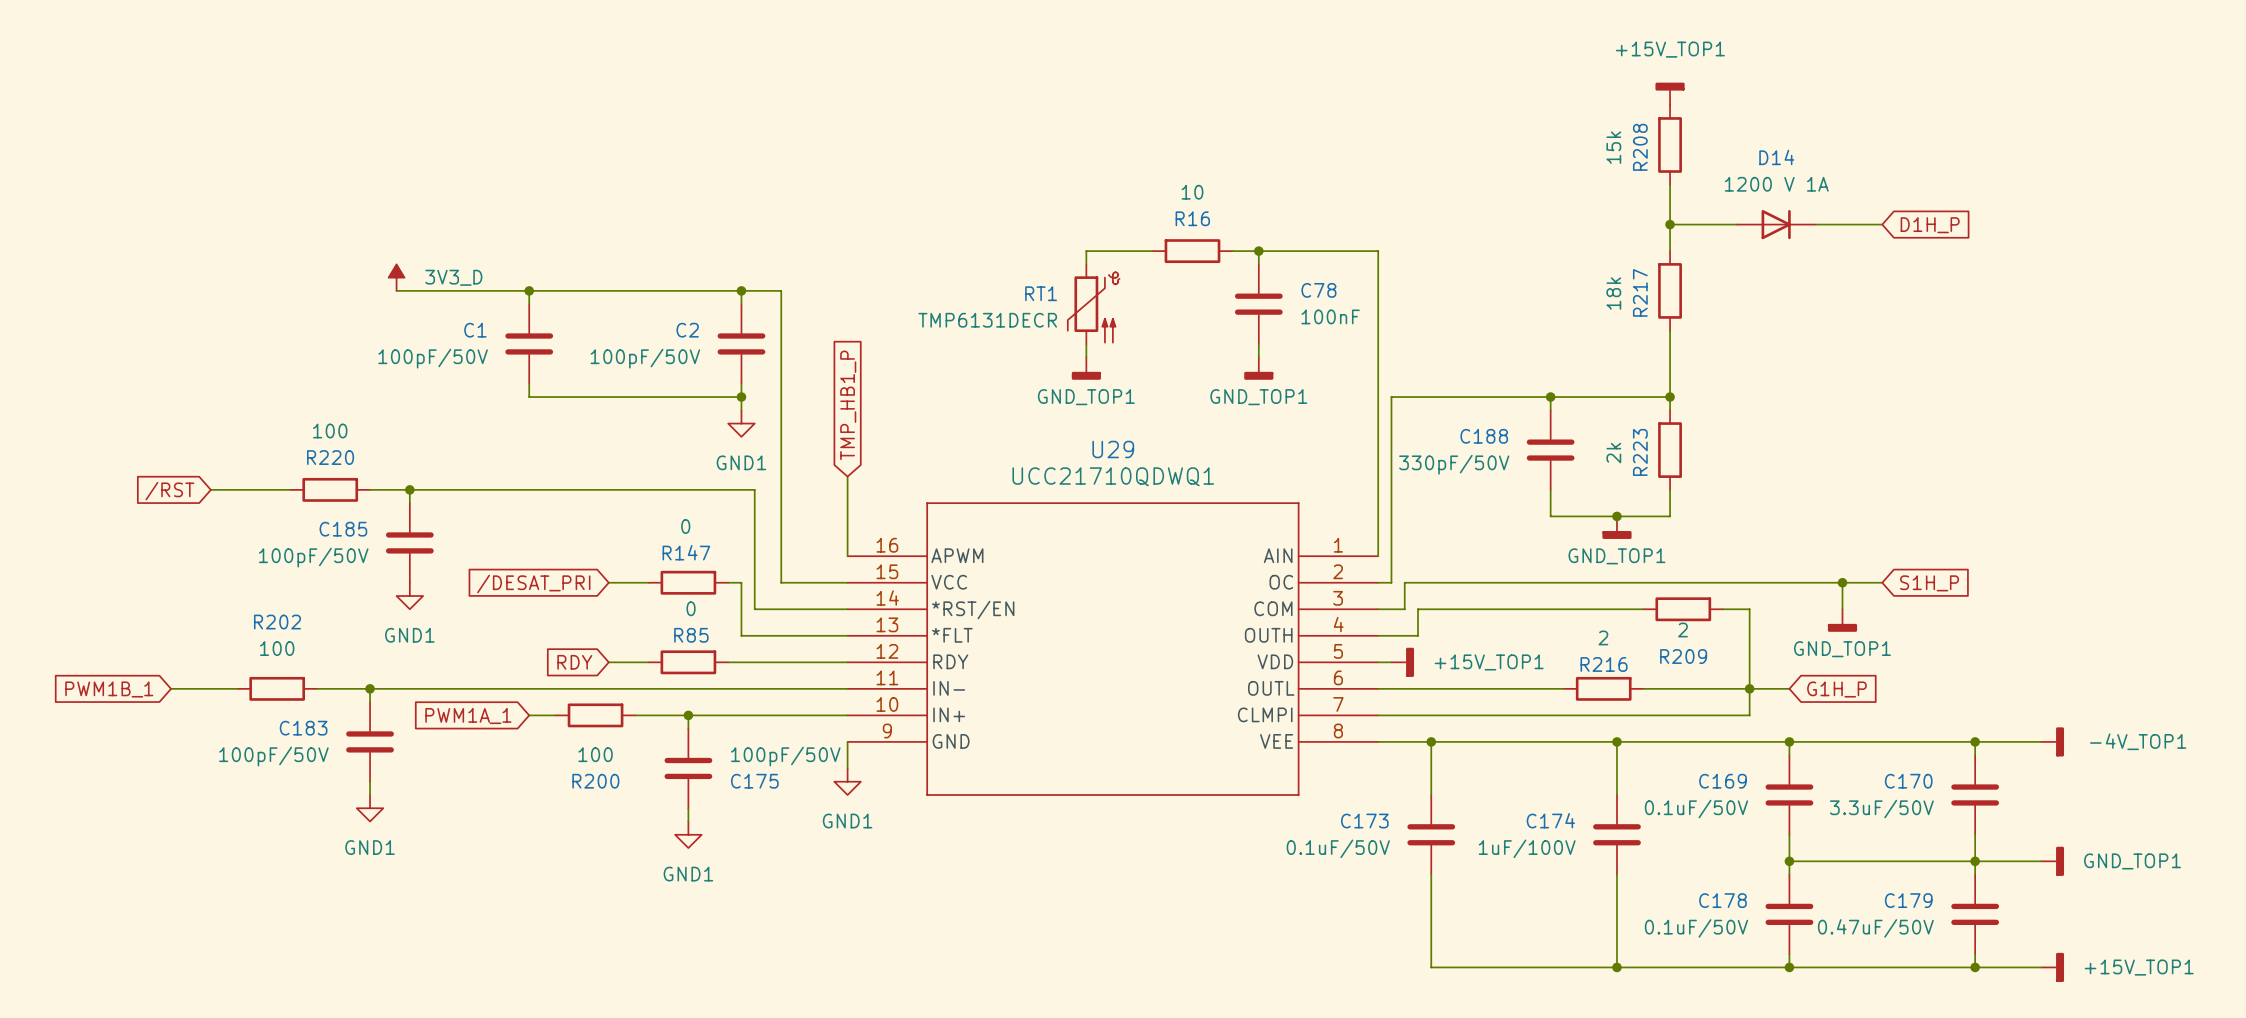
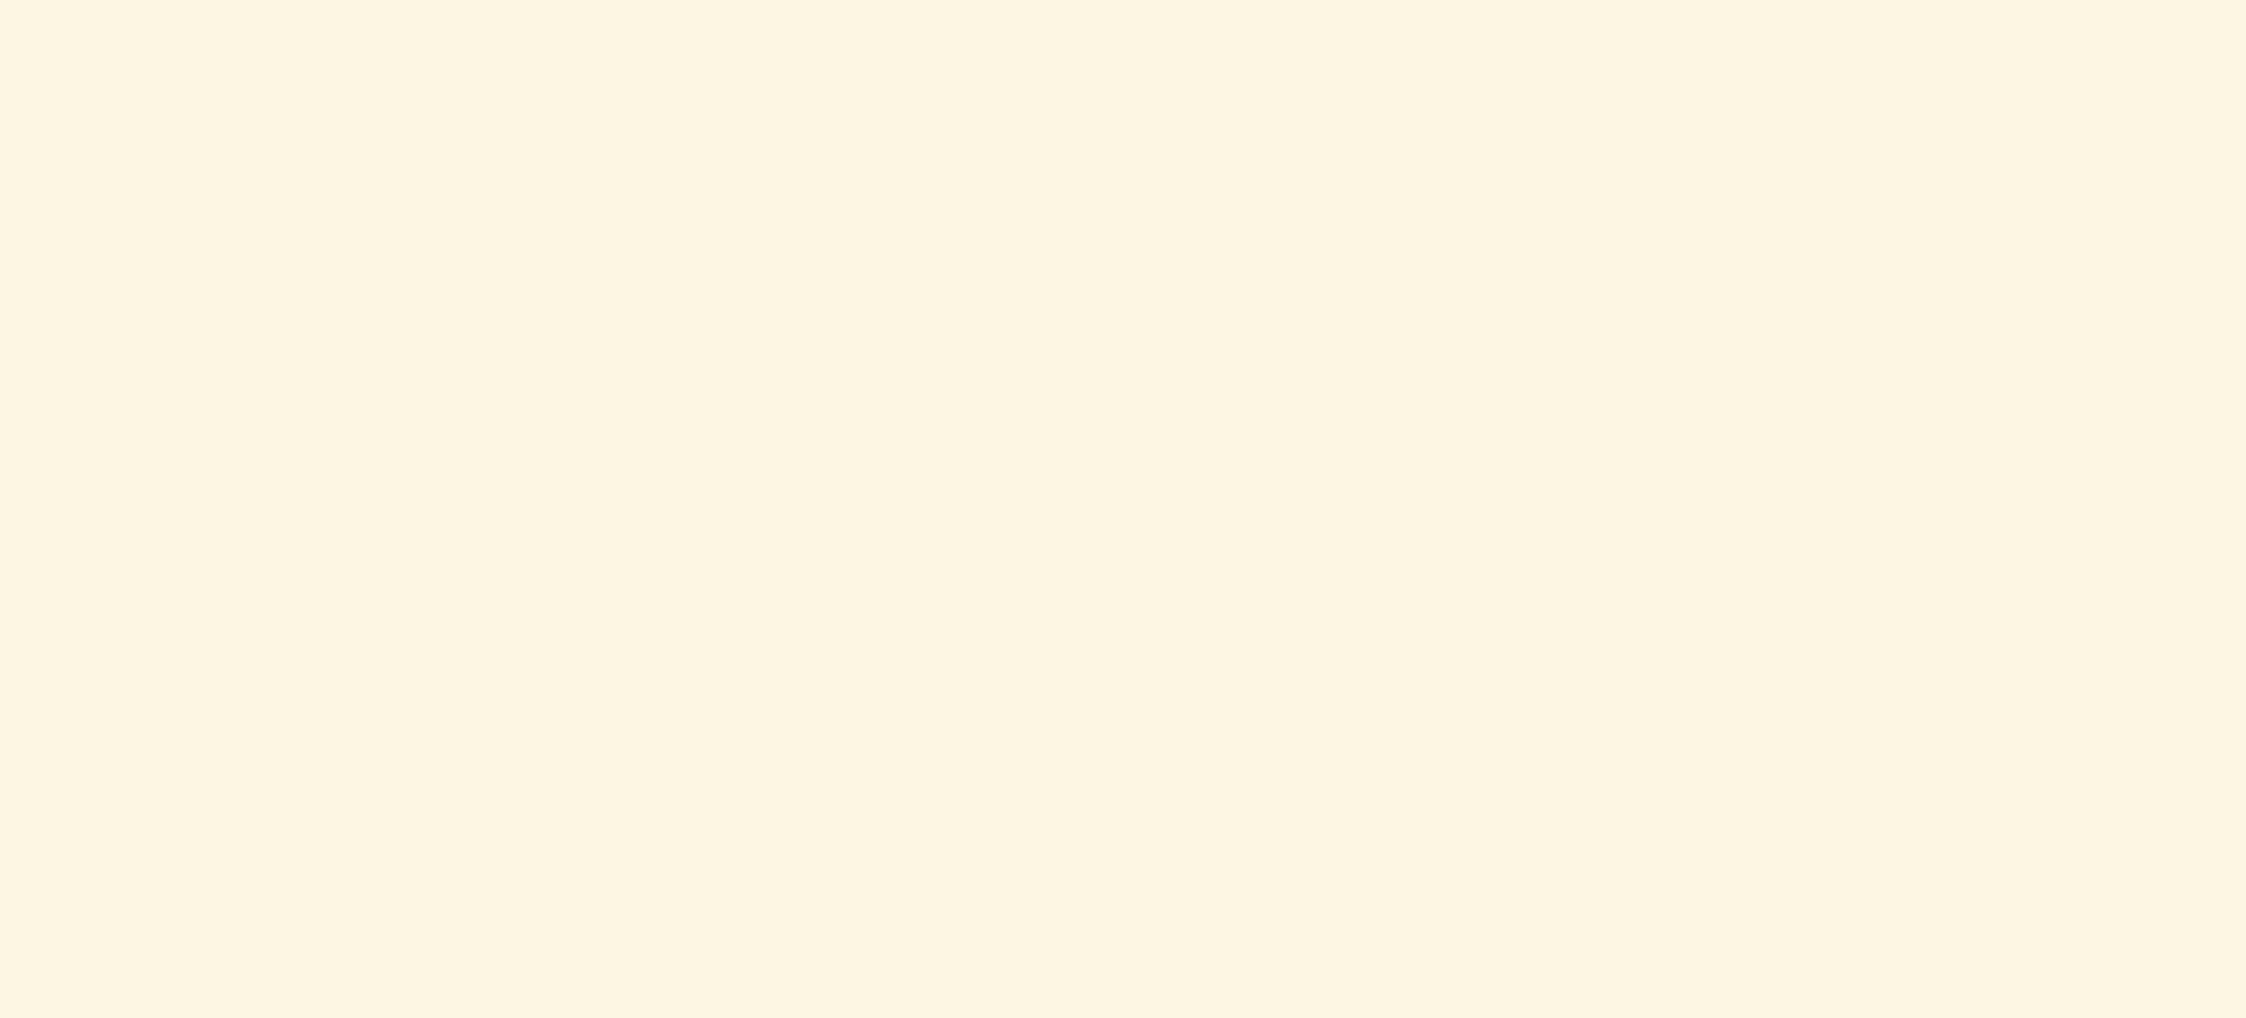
power symbol: +15V_TOP1 (1670, 93) -> none
R208: 15k (1670, 144) -> none
wire: (1670, 184) (1670, 251) -> none
wire: (1670, 224) (1736, 224) -> none
junction: (1670, 224) -> none
D14: 1200 V 1A (1776, 224) -> none
wire: (1815, 224) (1882, 224) -> none
global label: D1H_P (1930, 225) -> none
wire: (1152, 251) (1086, 251) (1086, 264) -> none
R16: 10 (1192, 251) -> none
wire: (1232, 251) (1378, 251) (1378, 556) -> none
wire: (1258, 251) (1258, 264) -> none
junction: (1258, 251) -> none
power symbol: 3V3_D (396, 277) -> none
wire: (396, 290) (781, 290) (781, 582) (847, 582) -> none
wire: (529, 290) (529, 304) -> none
junction: (529, 290) -> none
wire: (741, 290) (741, 304) -> none
junction: (741, 290) -> none
R217: 18k (1670, 290) -> none
RT1: TMP6131DECR (1093, 304) -> none
C78: 100nF (1258, 304) -> none
wire: (1670, 330) (1670, 410) -> none
C1: 100pF/50V (529, 343) -> none
C2: 100pF/50V (741, 343) -> none
wire: (1086, 343) (1086, 357) -> none
wire: (1258, 343) (1258, 357) -> none
power symbol: GND_TOP1 (1086, 368) -> none
power symbol: GND_TOP1 (1258, 368) -> none
wire: (529, 383) (529, 397) (741, 397) -> none
wire: (741, 383) (741, 410) -> none
junction: (741, 397) -> none
wire: (1550, 397) (1550, 410) -> none
junction: (1550, 397) -> none
wire: (1670, 397) (1391, 397) (1391, 582) (1378, 582) -> none
junction: (1670, 397) -> none
global label: TMP_HB1_P (848, 405) -> none
power symbol: GND1 (741, 423) -> none
C188: 330pF/50V (1550, 450) -> none
R223: 2k (1670, 450) -> none
wire: (847, 476) (847, 556) -> none
wire: (210, 489) (290, 489) -> none
R220: 100 (330, 489) -> none
wire: (370, 489) (754, 489) (754, 609) (847, 609) -> none
wire: (409, 489) (409, 503) -> none
junction: (409, 489) -> none
wire: (1550, 489) (1550, 516) (1670, 516) (1670, 489) -> none
global label: /RST (169, 491) -> none
junction: (1616, 516) -> none
power symbol: GND_TOP1 (1616, 527) -> none
C185: 100pF/50V (409, 542) -> none
wire: (608, 582) (648, 582) -> none
R147: 0 (688, 582) -> none
wire: (728, 582) (741, 582) (741, 635) (847, 635) -> none
wire: (1842, 582) (1842, 609) -> none
junction: (1842, 582) -> none
wire: (1882, 582) (1404, 582) (1404, 609) (1378, 609) -> none
global label: S1H_P (1929, 583) -> none
global label: /DESAT_PRI (533, 584) -> none
power symbol: GND1 (409, 596) -> none
wire: (1643, 609) (1418, 609) (1418, 635) (1378, 635) -> none
R209: 2 (1683, 609) -> none
wire: (1723, 609) (1749, 609) (1749, 715) (1378, 715) -> none
power symbol: GND_TOP1 (1842, 620) -> none
U29: UCC21710QDWQ1 (1112, 649) -> none
global label: RDY (574, 662) -> none
wire: (608, 662) (648, 662) -> none
R85: 0 (688, 662) -> none
wire: (728, 662) (847, 662) -> none
wire: (1378, 662) (1391, 662) -> none
power symbol: +15V_TOP1 (1402, 662) -> none
wire: (171, 688) (237, 688) -> none
R202: 100 (277, 688) -> none
wire: (316, 688) (847, 688) -> none
wire: (370, 688) (370, 702) -> none
junction: (370, 688) -> none
wire: (1378, 688) (1563, 688) -> none
R216: 2 (1603, 688) -> none
wire: (1643, 688) (1789, 688) -> none
junction: (1749, 688) -> none
global label: PWM1B_1 (109, 689) -> none
global label: G1H_P (1836, 689) -> none
wire: (529, 715) (555, 715) -> none
R200: 100 (595, 715) -> none
wire: (635, 715) (847, 715) -> none
wire: (688, 715) (688, 728) -> none
junction: (688, 715) -> none
global label: PWM1A_1 (468, 716) -> none
C183: 100pF/50V (370, 741) -> none
wire: (847, 741) (847, 768) -> none
wire: (1378, 741) (2041, 741) -> none
wire: (1431, 741) (1431, 794) -> none
junction: (1431, 741) -> none
wire: (1616, 741) (1616, 794) -> none
junction: (1616, 741) -> none
wire: (1789, 741) (1789, 755) -> none
junction: (1789, 741) -> none
wire: (1975, 741) (1975, 755) -> none
junction: (1975, 741) -> none
power symbol: -4V_TOP1 (2052, 741) -> none
C175: 100pF/50V (688, 768) -> none
wire: (370, 781) (370, 794) -> none
power symbol: GND1 (847, 781) -> none
C169: 0.1uF/50V (1789, 794) -> none
C170: 3.3uF/50V (1975, 794) -> none
power symbol: GND1 (370, 808) -> none
wire: (688, 808) (688, 821) -> none
power symbol: GND1 (688, 834) -> none
C173: 0.1uF/50V (1431, 834) -> none
C174: 1uF/100V (1616, 834) -> none
wire: (1789, 834) (1789, 874) -> none
wire: (1975, 834) (1975, 874) -> none
wire: (1789, 861) (2041, 861) -> none
junction: (1789, 861) -> none
junction: (1975, 861) -> none
power symbol: GND_TOP1 (2052, 861) -> none
wire: (1431, 874) (1431, 967) (2041, 967) -> none
wire: (1616, 874) (1616, 967) -> none
C178: 0.1uF/50V (1789, 914) -> none
C179: 0.47uF/50V (1975, 914) -> none
wire: (1789, 954) (1789, 967) -> none
wire: (1975, 954) (1975, 967) -> none
junction: (1616, 967) -> none
junction: (1789, 967) -> none
junction: (1975, 967) -> none
power symbol: +15V_TOP1 (2052, 967) -> none

